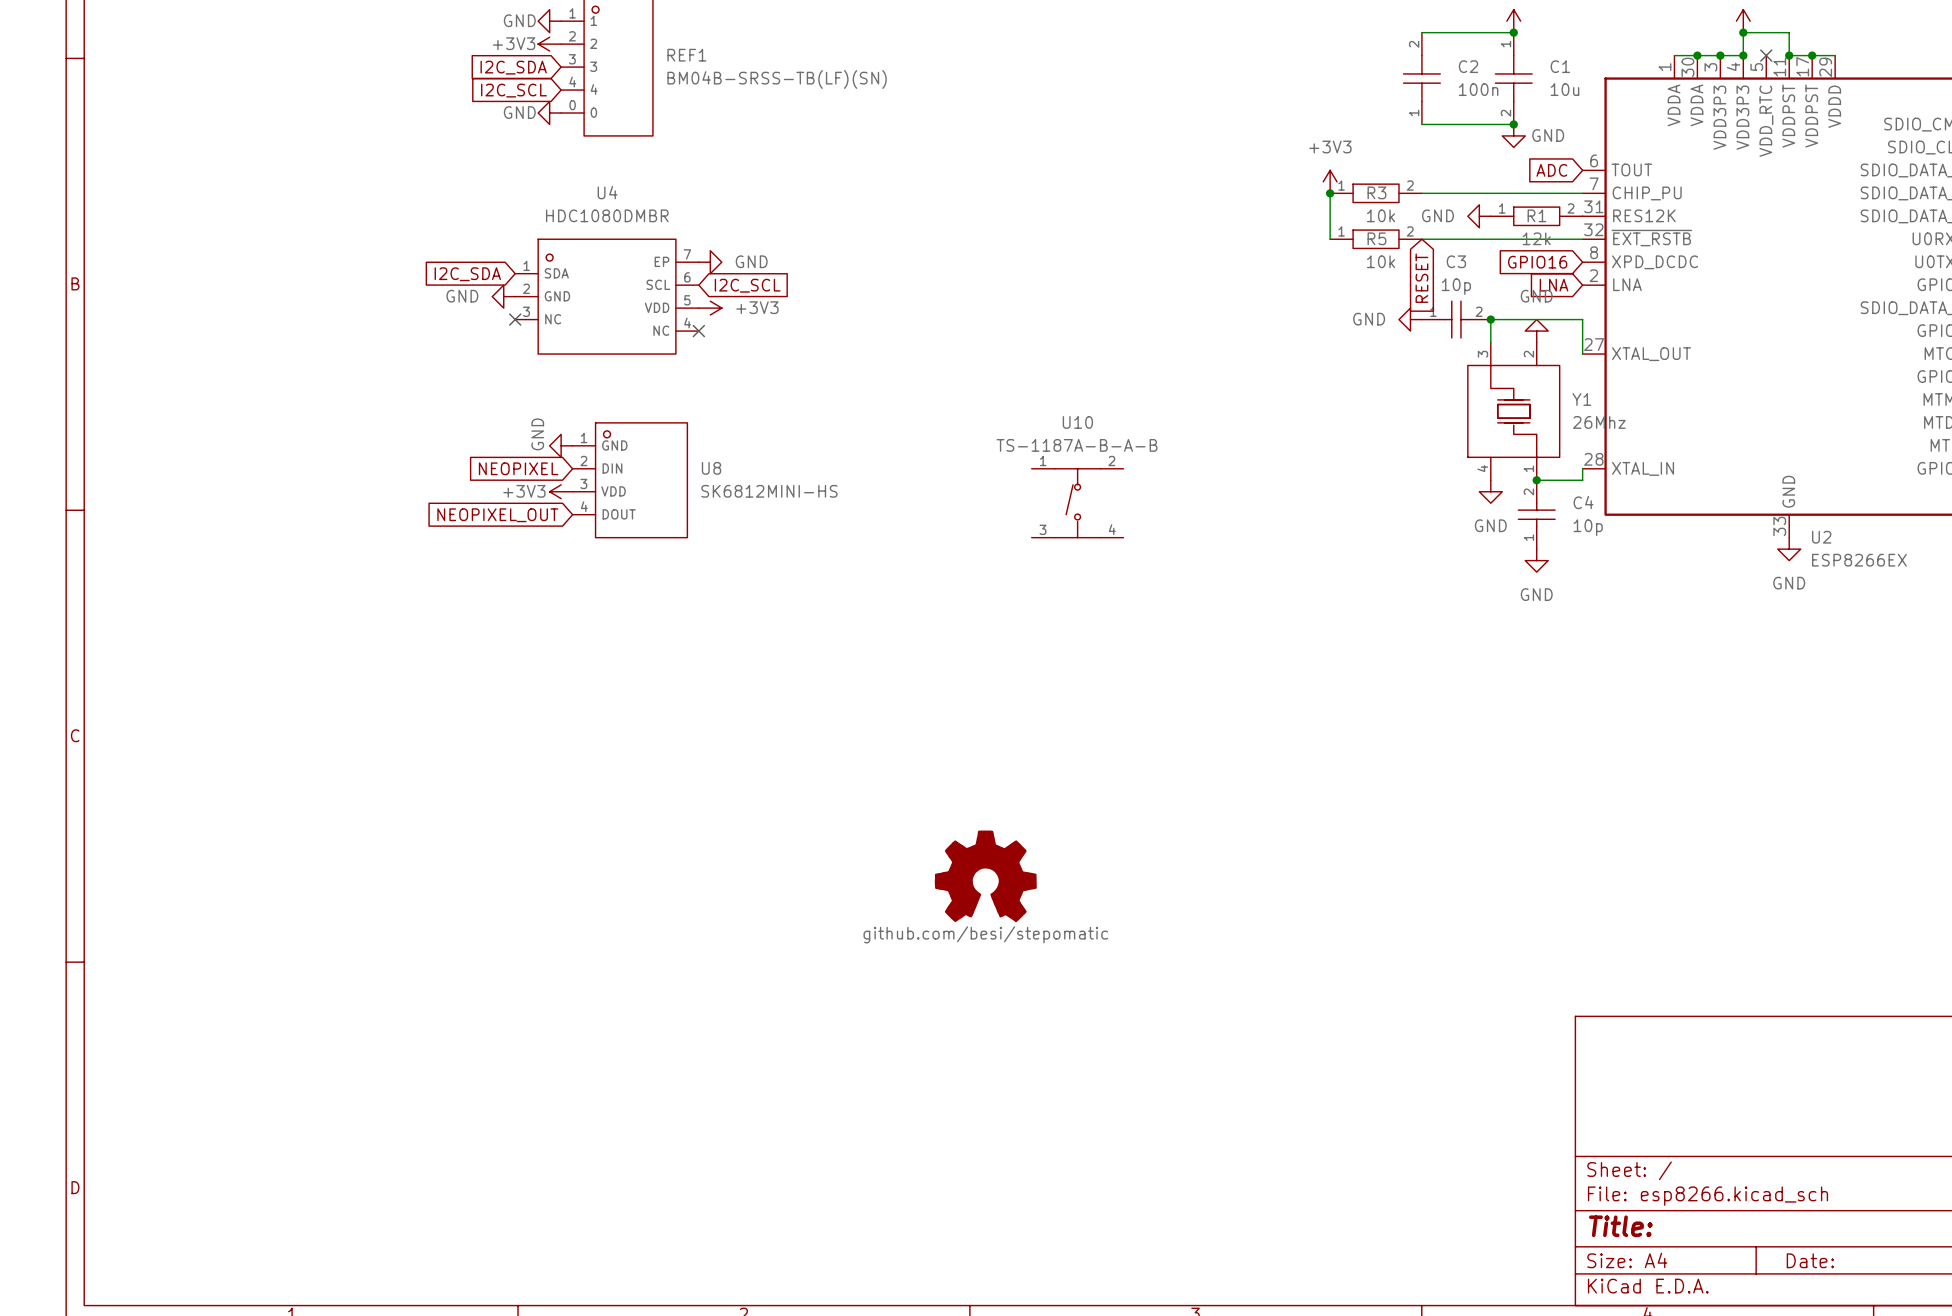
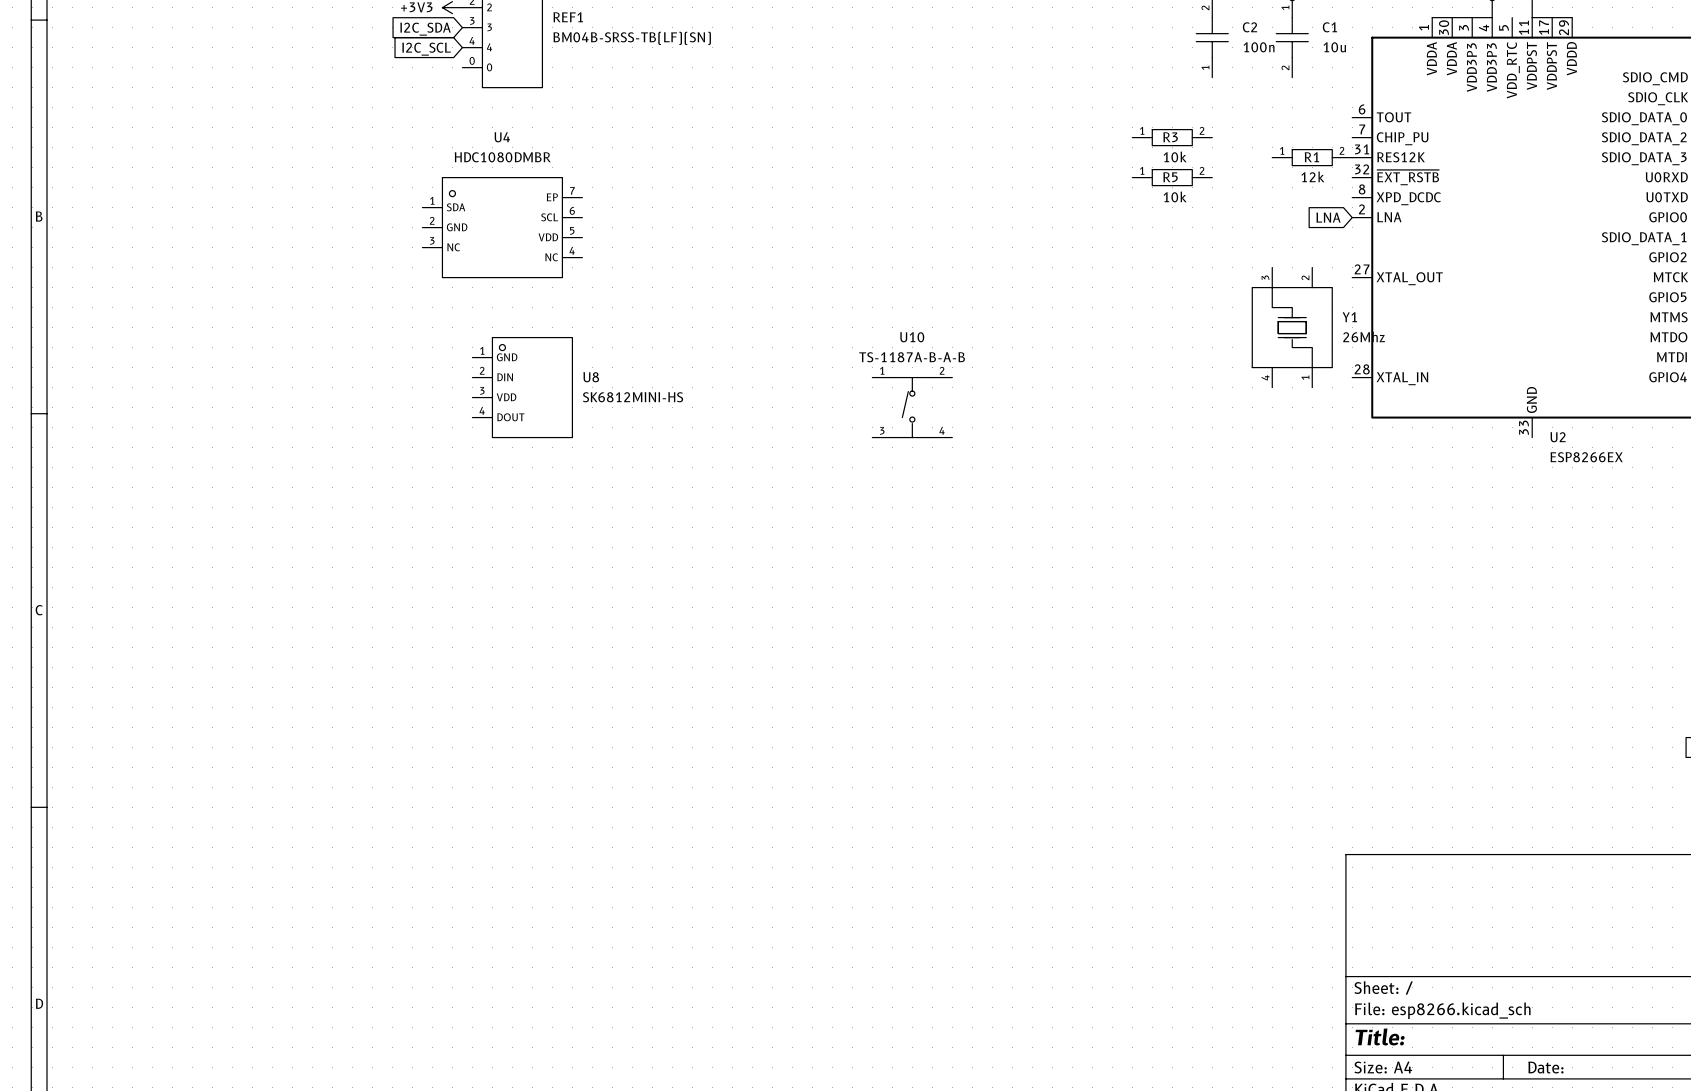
junction: (1697, 55) -> none
junction: (1720, 55) -> none
junction: (1743, 55) -> none
no-connect mark: (1766, 55) -> none
junction: (1789, 55) -> none
junction: (1812, 55) -> none
power symbol: GND (549, 112) -> none
wire: (1421, 124) (1513, 124) -> none
junction: (1513, 124) -> none
power symbol: GND (1513, 135) -> none
global label: ADC (1551, 170) -> none
power symbol: +3V3 (1330, 181) -> none
wire: (1330, 193) (1330, 239) -> none
junction: (1330, 193) -> none
wire: (1421, 193) (1582, 193) -> none
power symbol: GND (1479, 216) -> none
wire: (1421, 239) (1582, 239) -> none
power symbol: GND (710, 262) -> none
global label: GPIO16 (1537, 262) -> none
global label: I2C_SDA (467, 274) -> none
global label: RESET (1421, 278) -> none
global label: I2C_SCL (747, 285) -> none
power symbol: GND (503, 296) -> none
power symbol: +3V3 (710, 308) -> none
no-connect mark: (515, 319) -> none
power symbol: GND (1410, 319) -> none
C3: 10p (1456, 319) -> none
junction: (1490, 319) -> none
no-connect mark: (698, 331) -> none
power symbol: GND (1536, 331) -> none
wire: (1490, 342) (1490, 319) (1582, 319) (1582, 354) -> none
power symbol: GND (561, 445) -> none
global label: NEOPIXEL (518, 468) -> none
wire: (1582, 468) (1582, 480) (1536, 480) -> none
junction: (1536, 480) -> none
power symbol: +3V3 (561, 491) -> none
power symbol: GND (1490, 491) -> none
C4: 10p (1536, 514) -> none
global label: NEOPIXEL_OUT (497, 515) -> none
power symbol: GND (1789, 549) -> none
power symbol: GND (1536, 560) -> none
part: github.com/besi/stepomatic (985, 876) -> none

